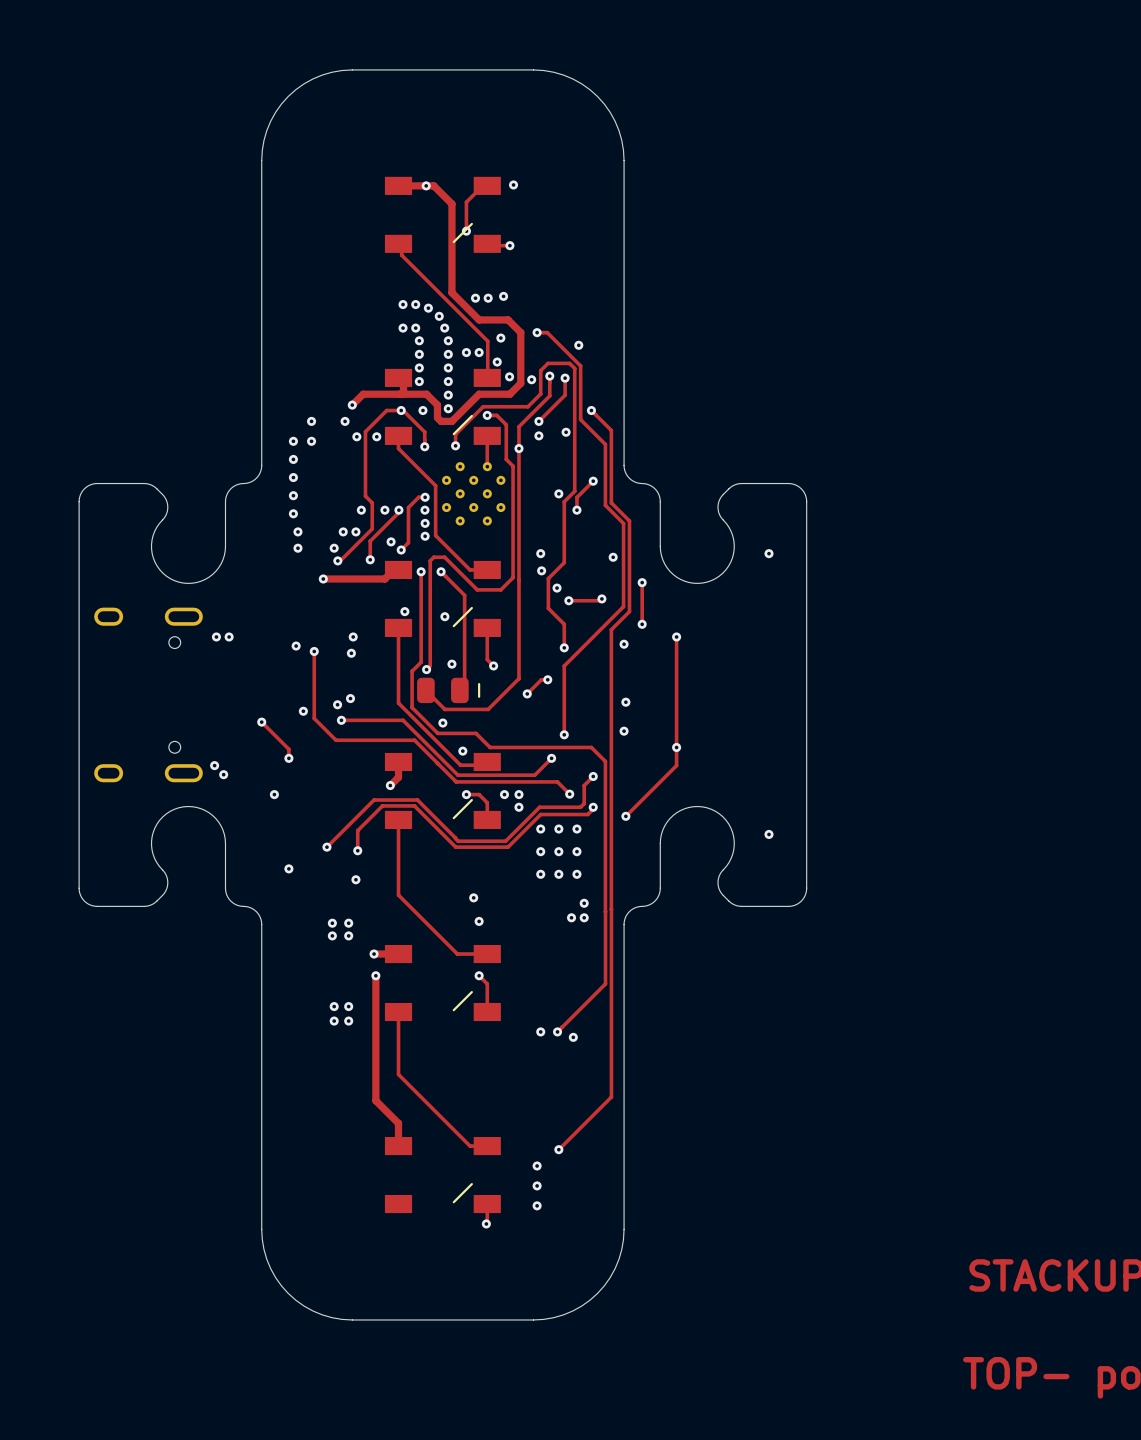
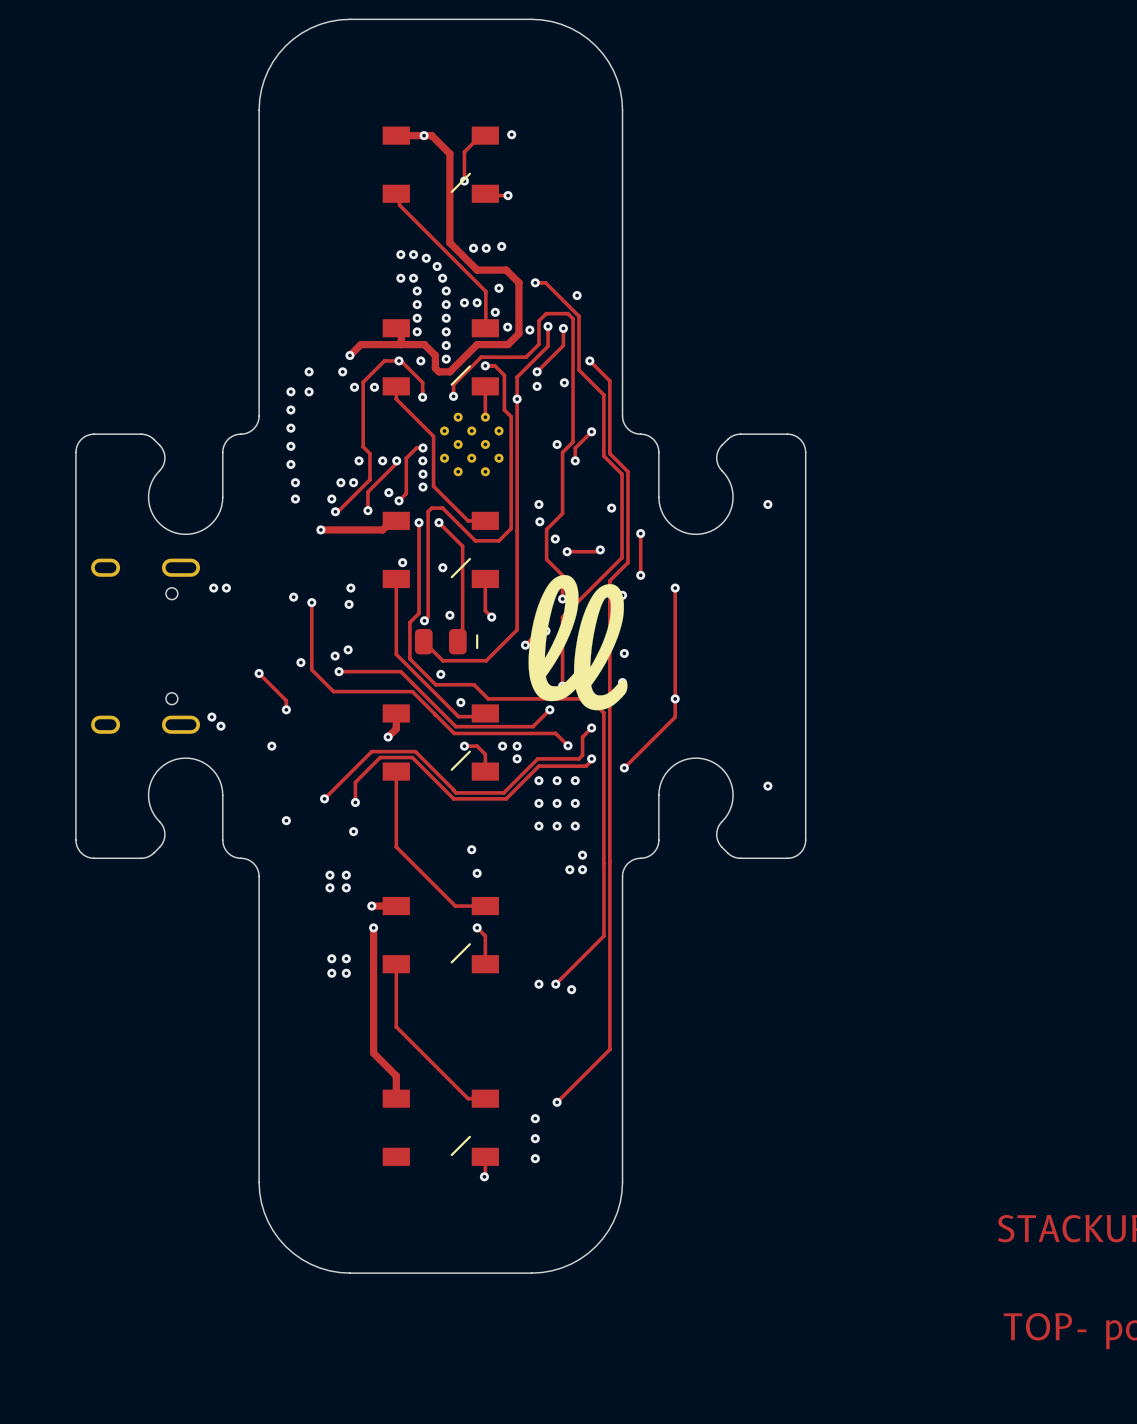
drawing: none -> [528, 574, 628, 711]

